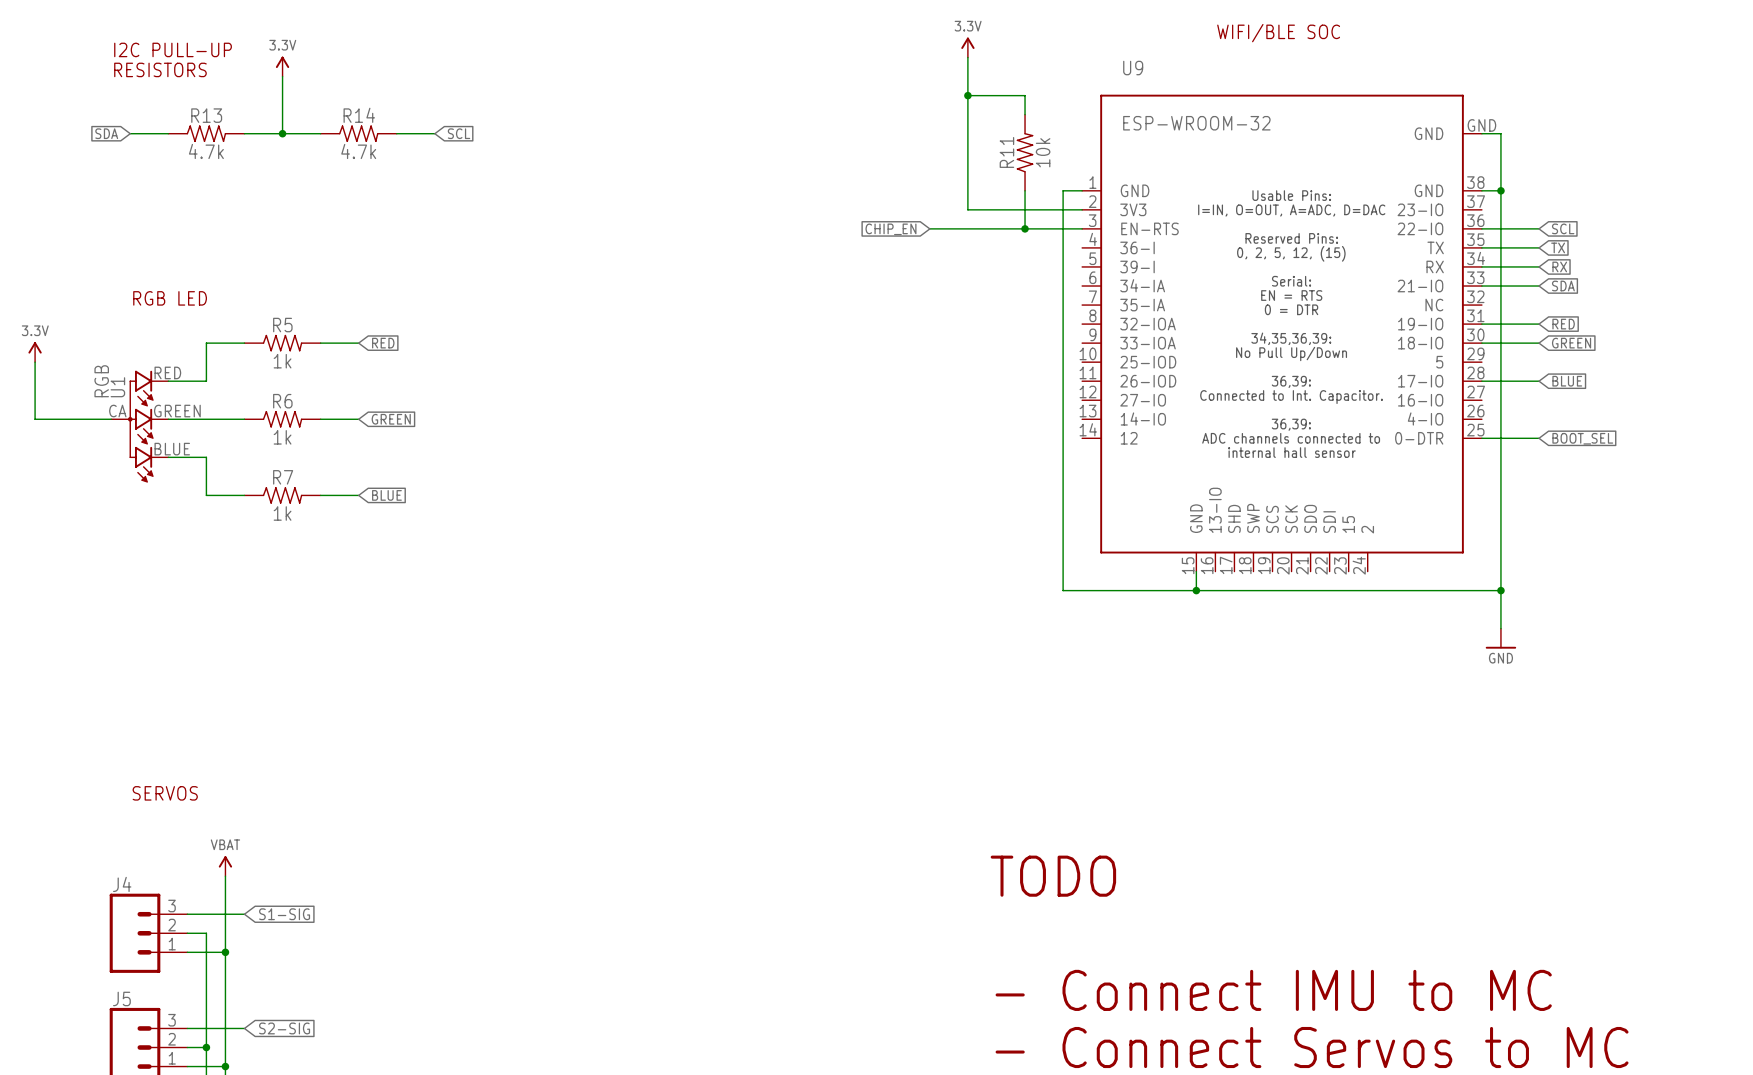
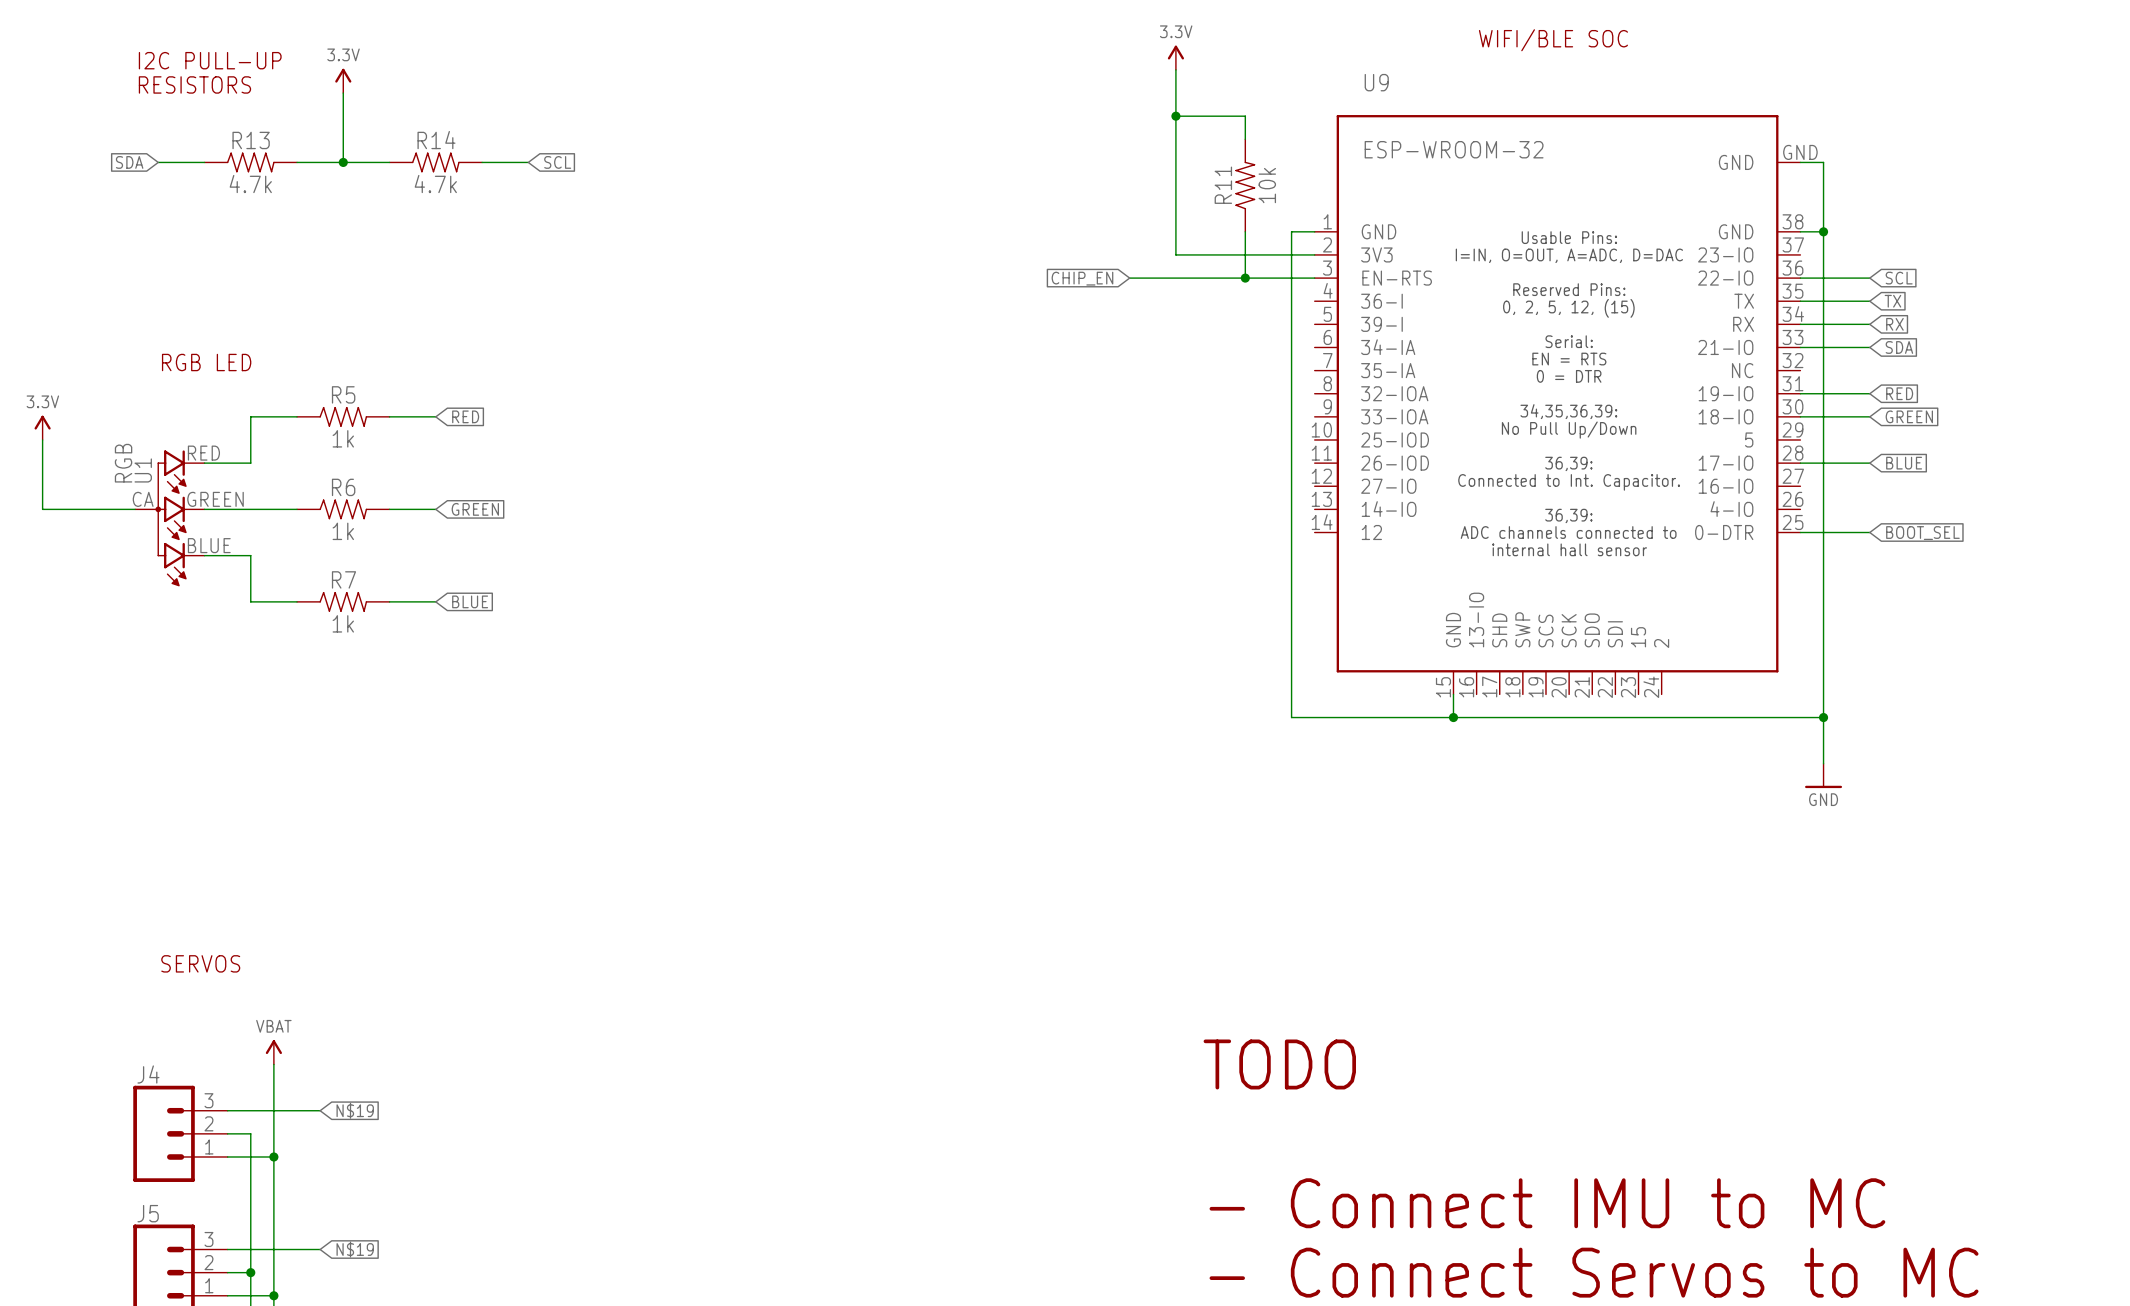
wire: none -> (297, 1110) (320, 1110)
global label: S1-SIG (284, 914) -> none
global label: none -> N$19 (355, 1110)
wire: none -> (297, 1249) (320, 1249)
global label: S2-SIG (284, 1028) -> none
global label: none -> N$19 (355, 1249)

